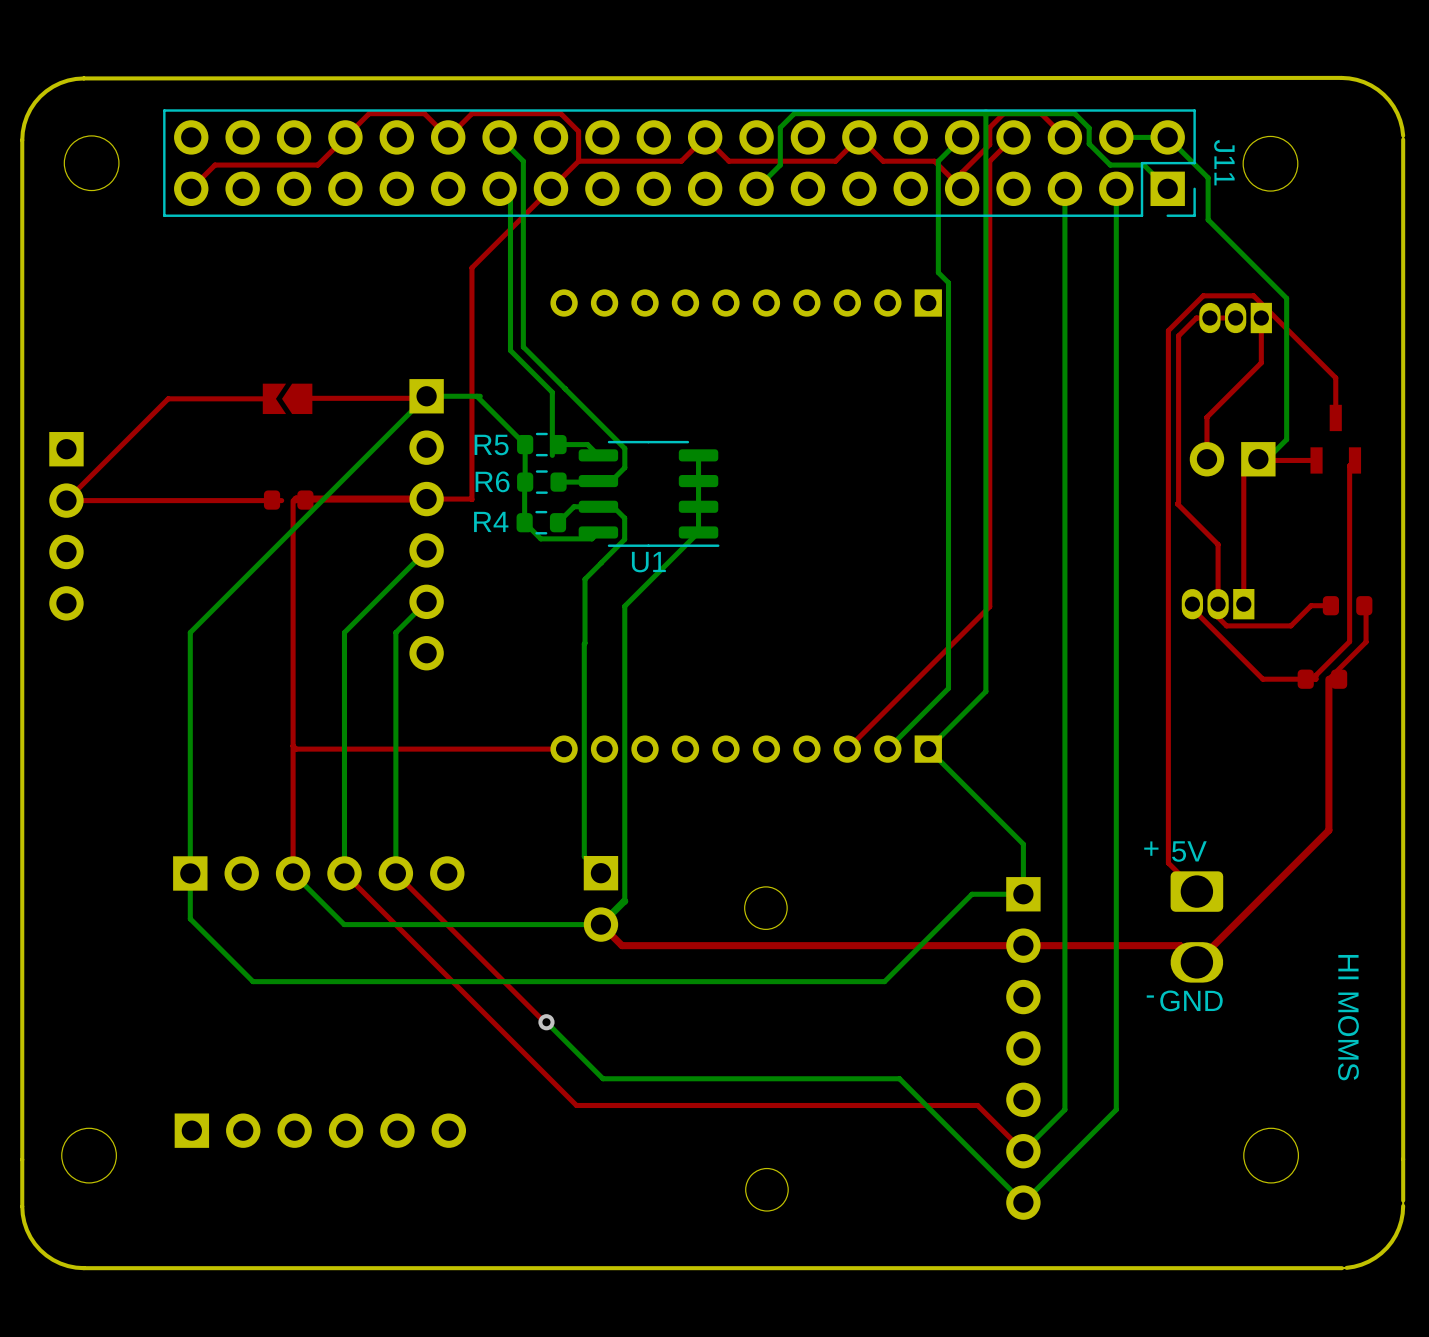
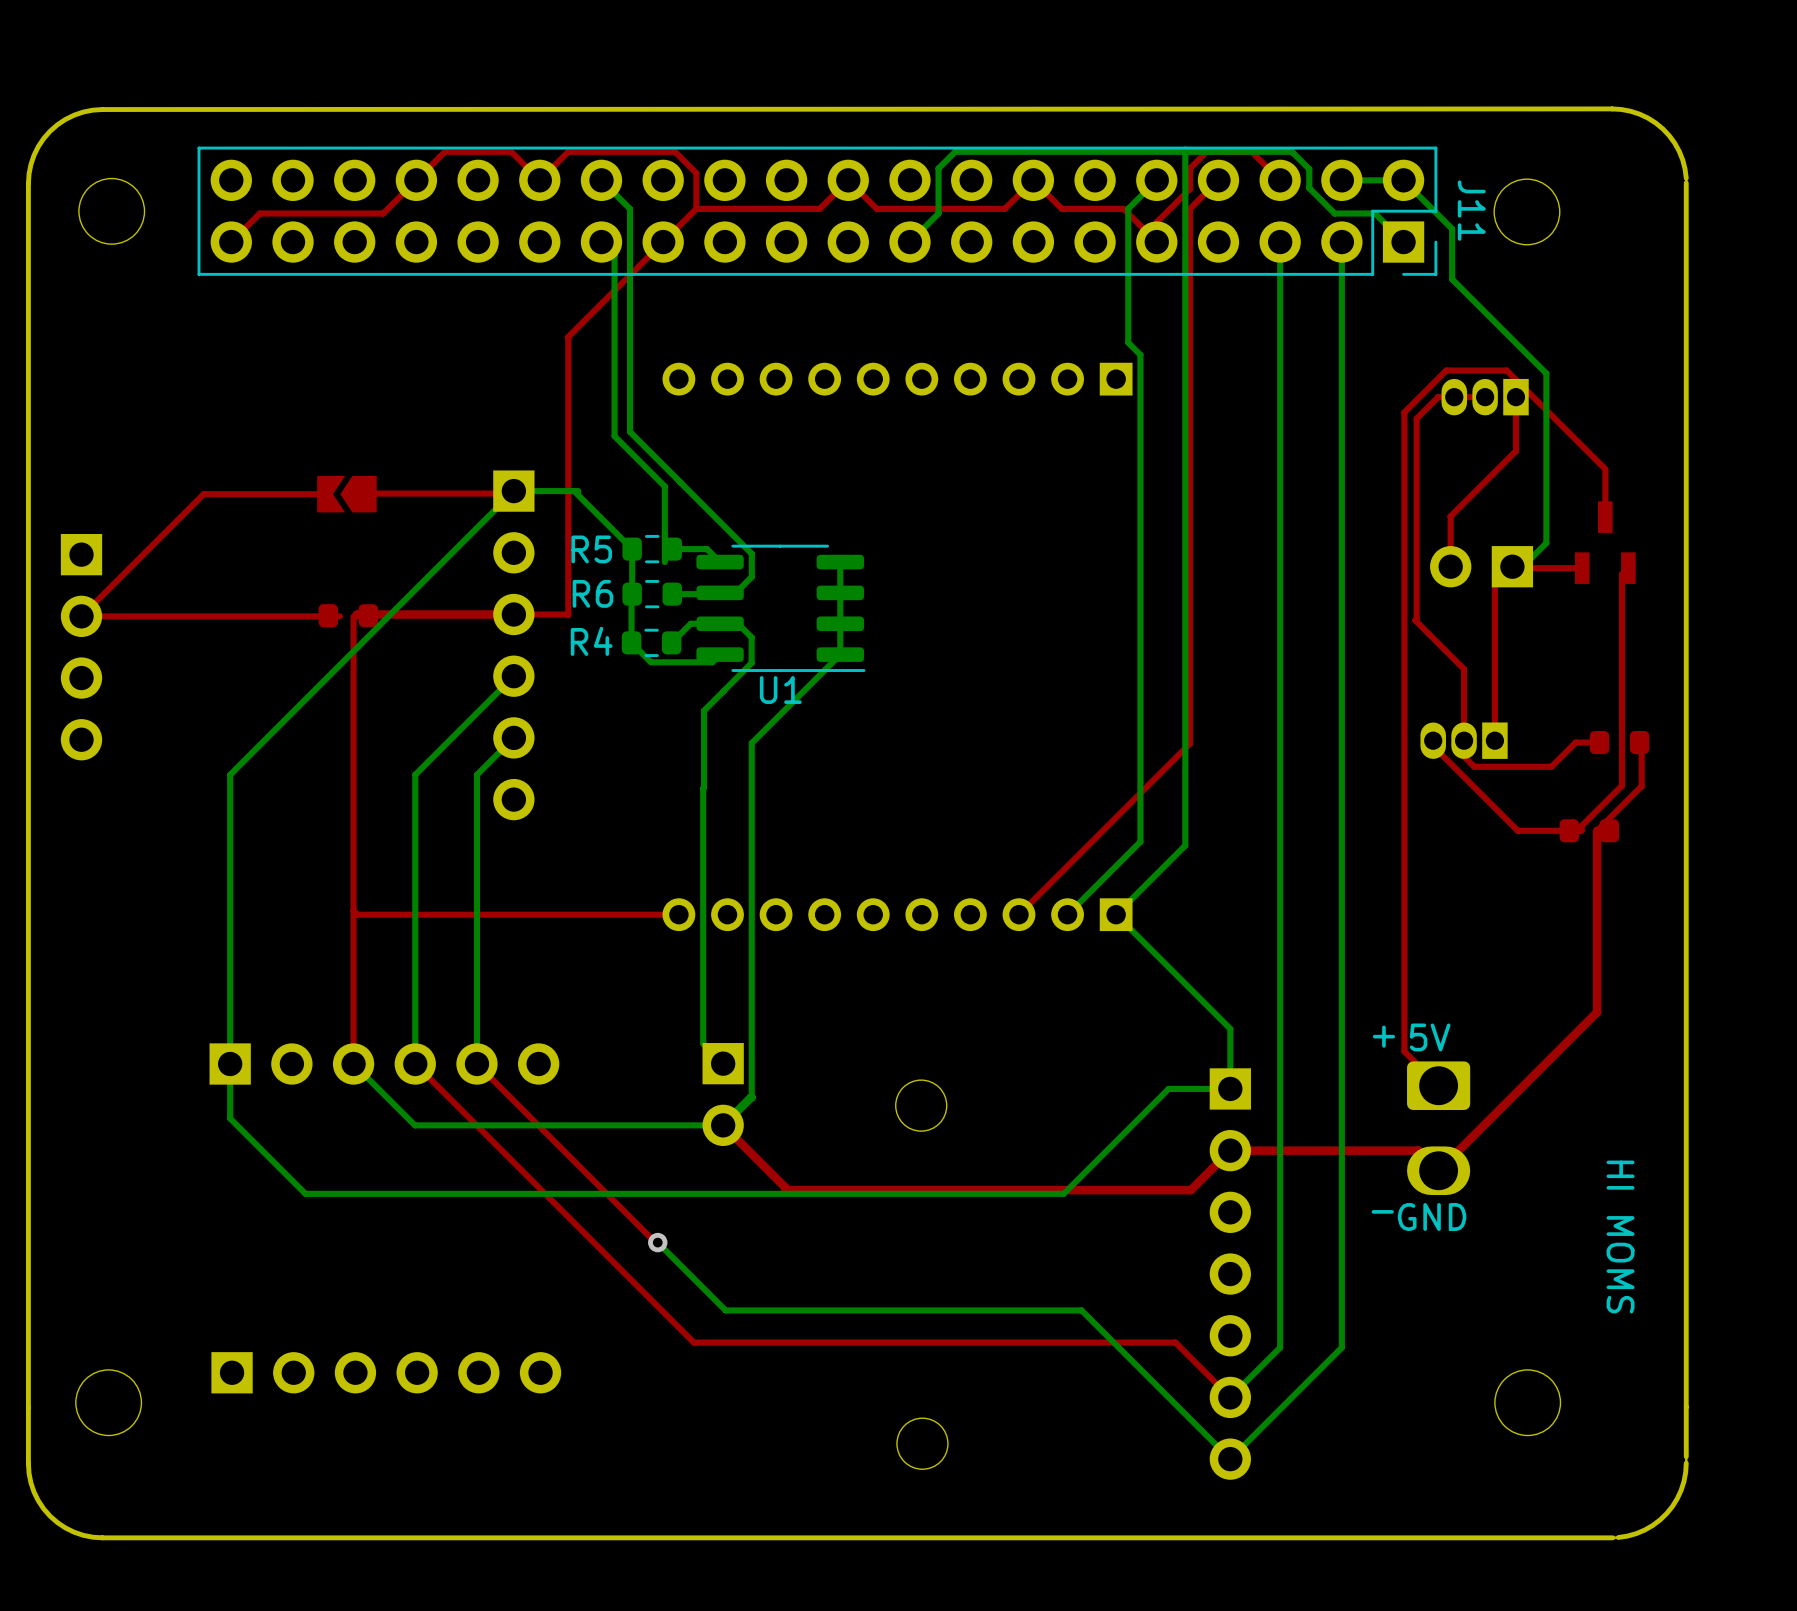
top track: (1023, 945) (622, 945) -> (1230, 1150) (1190, 1190) (785, 1190) (785, 1187) (748, 1150)

